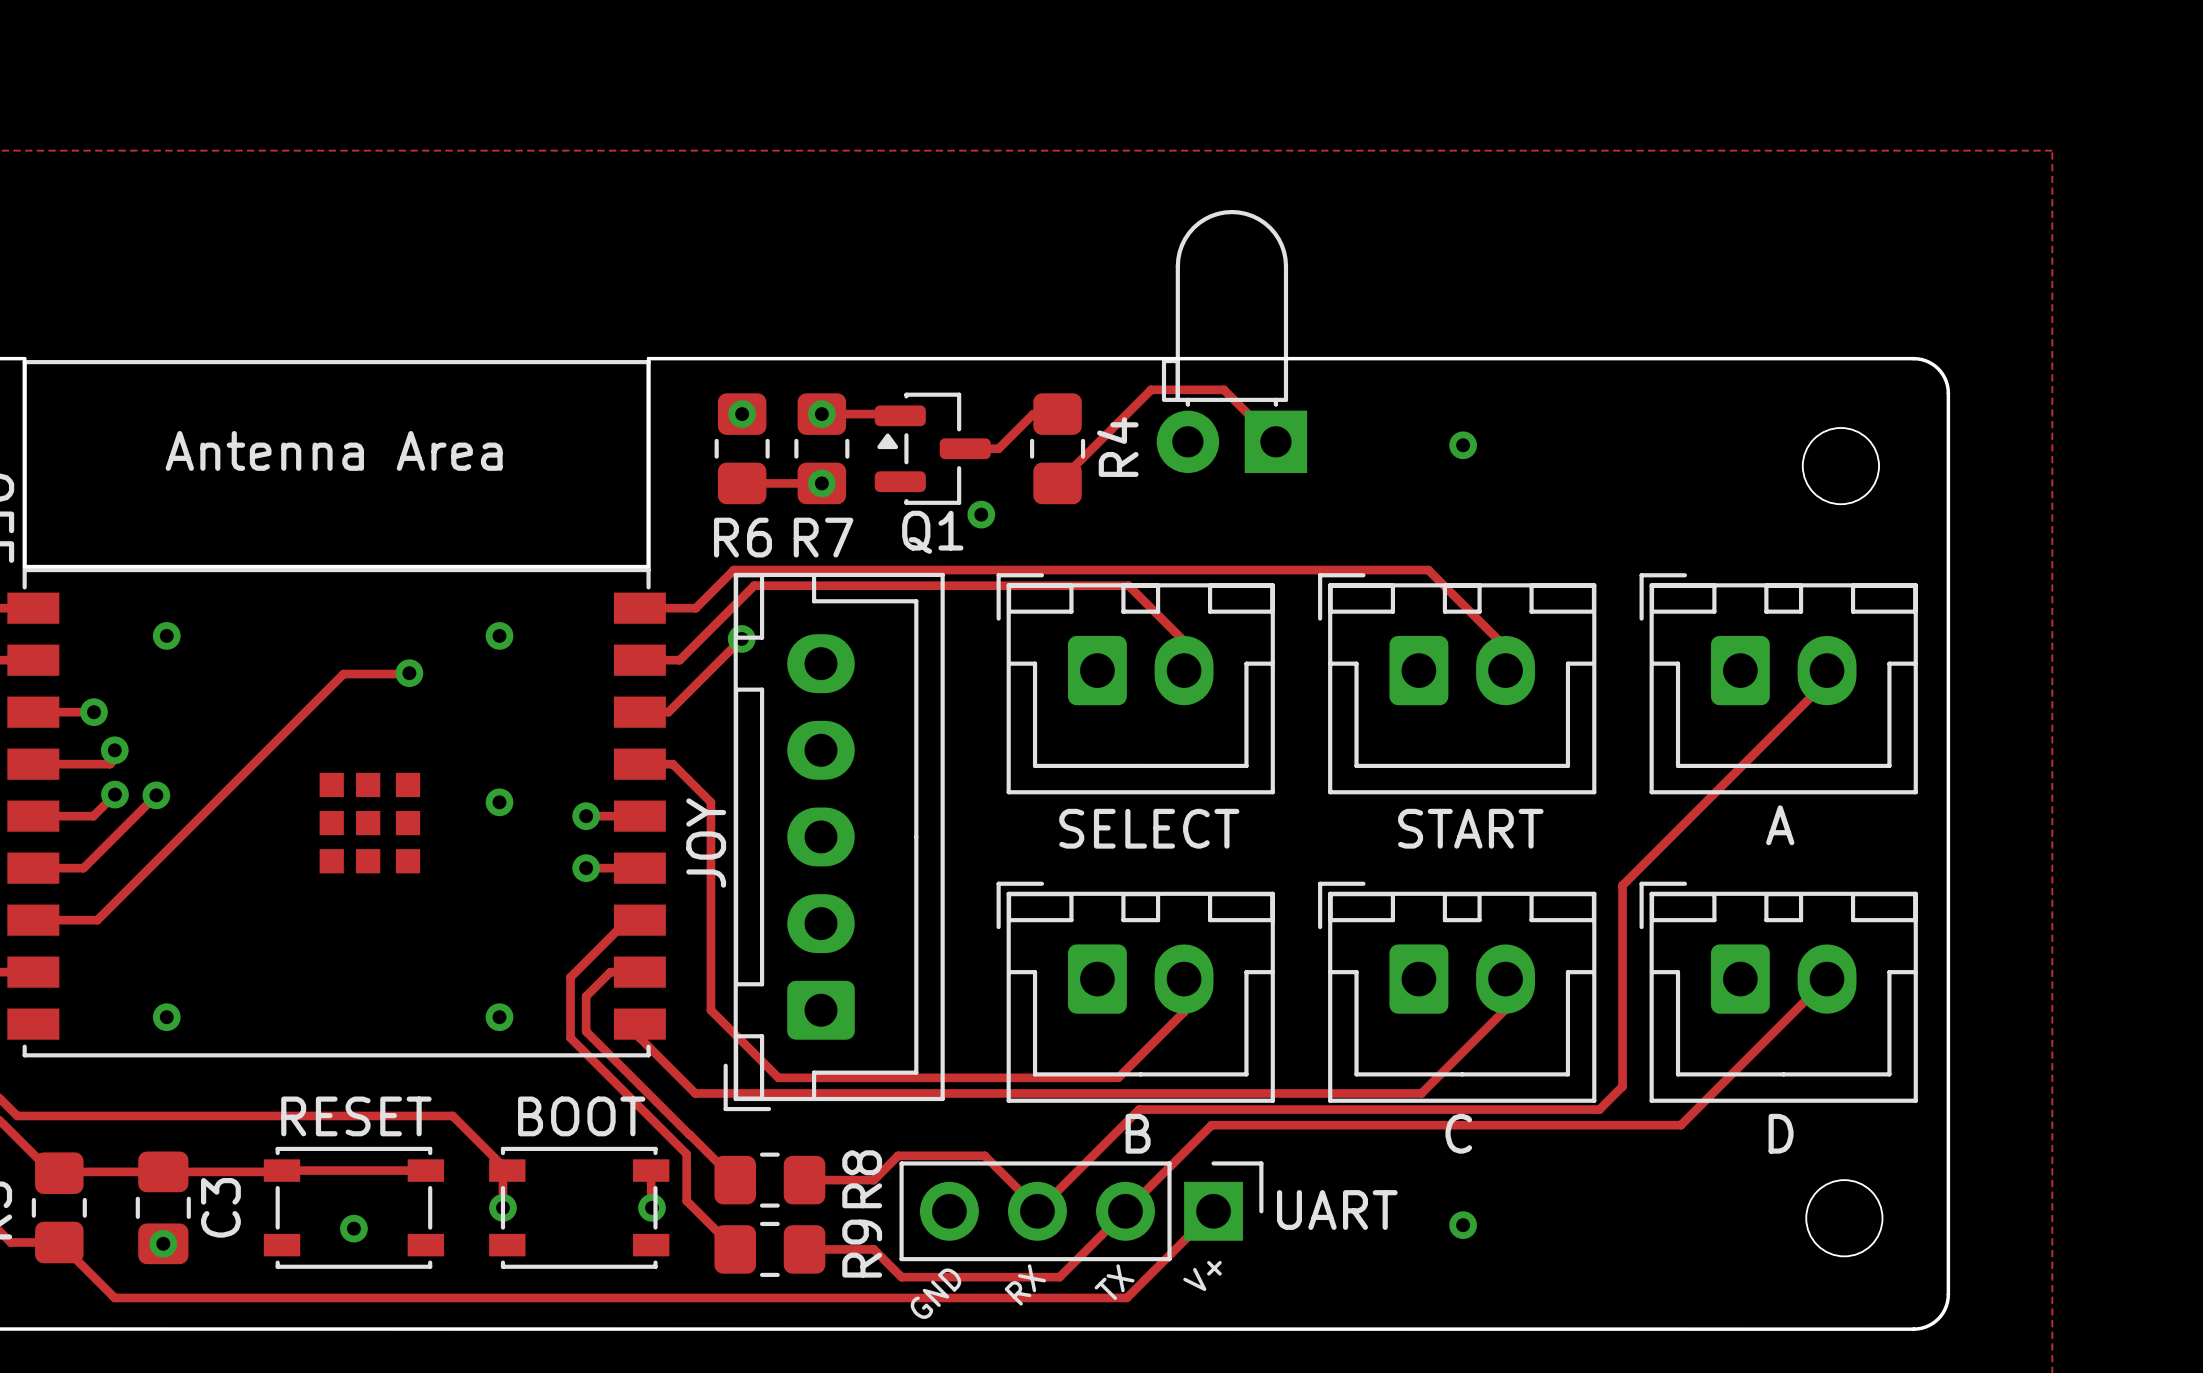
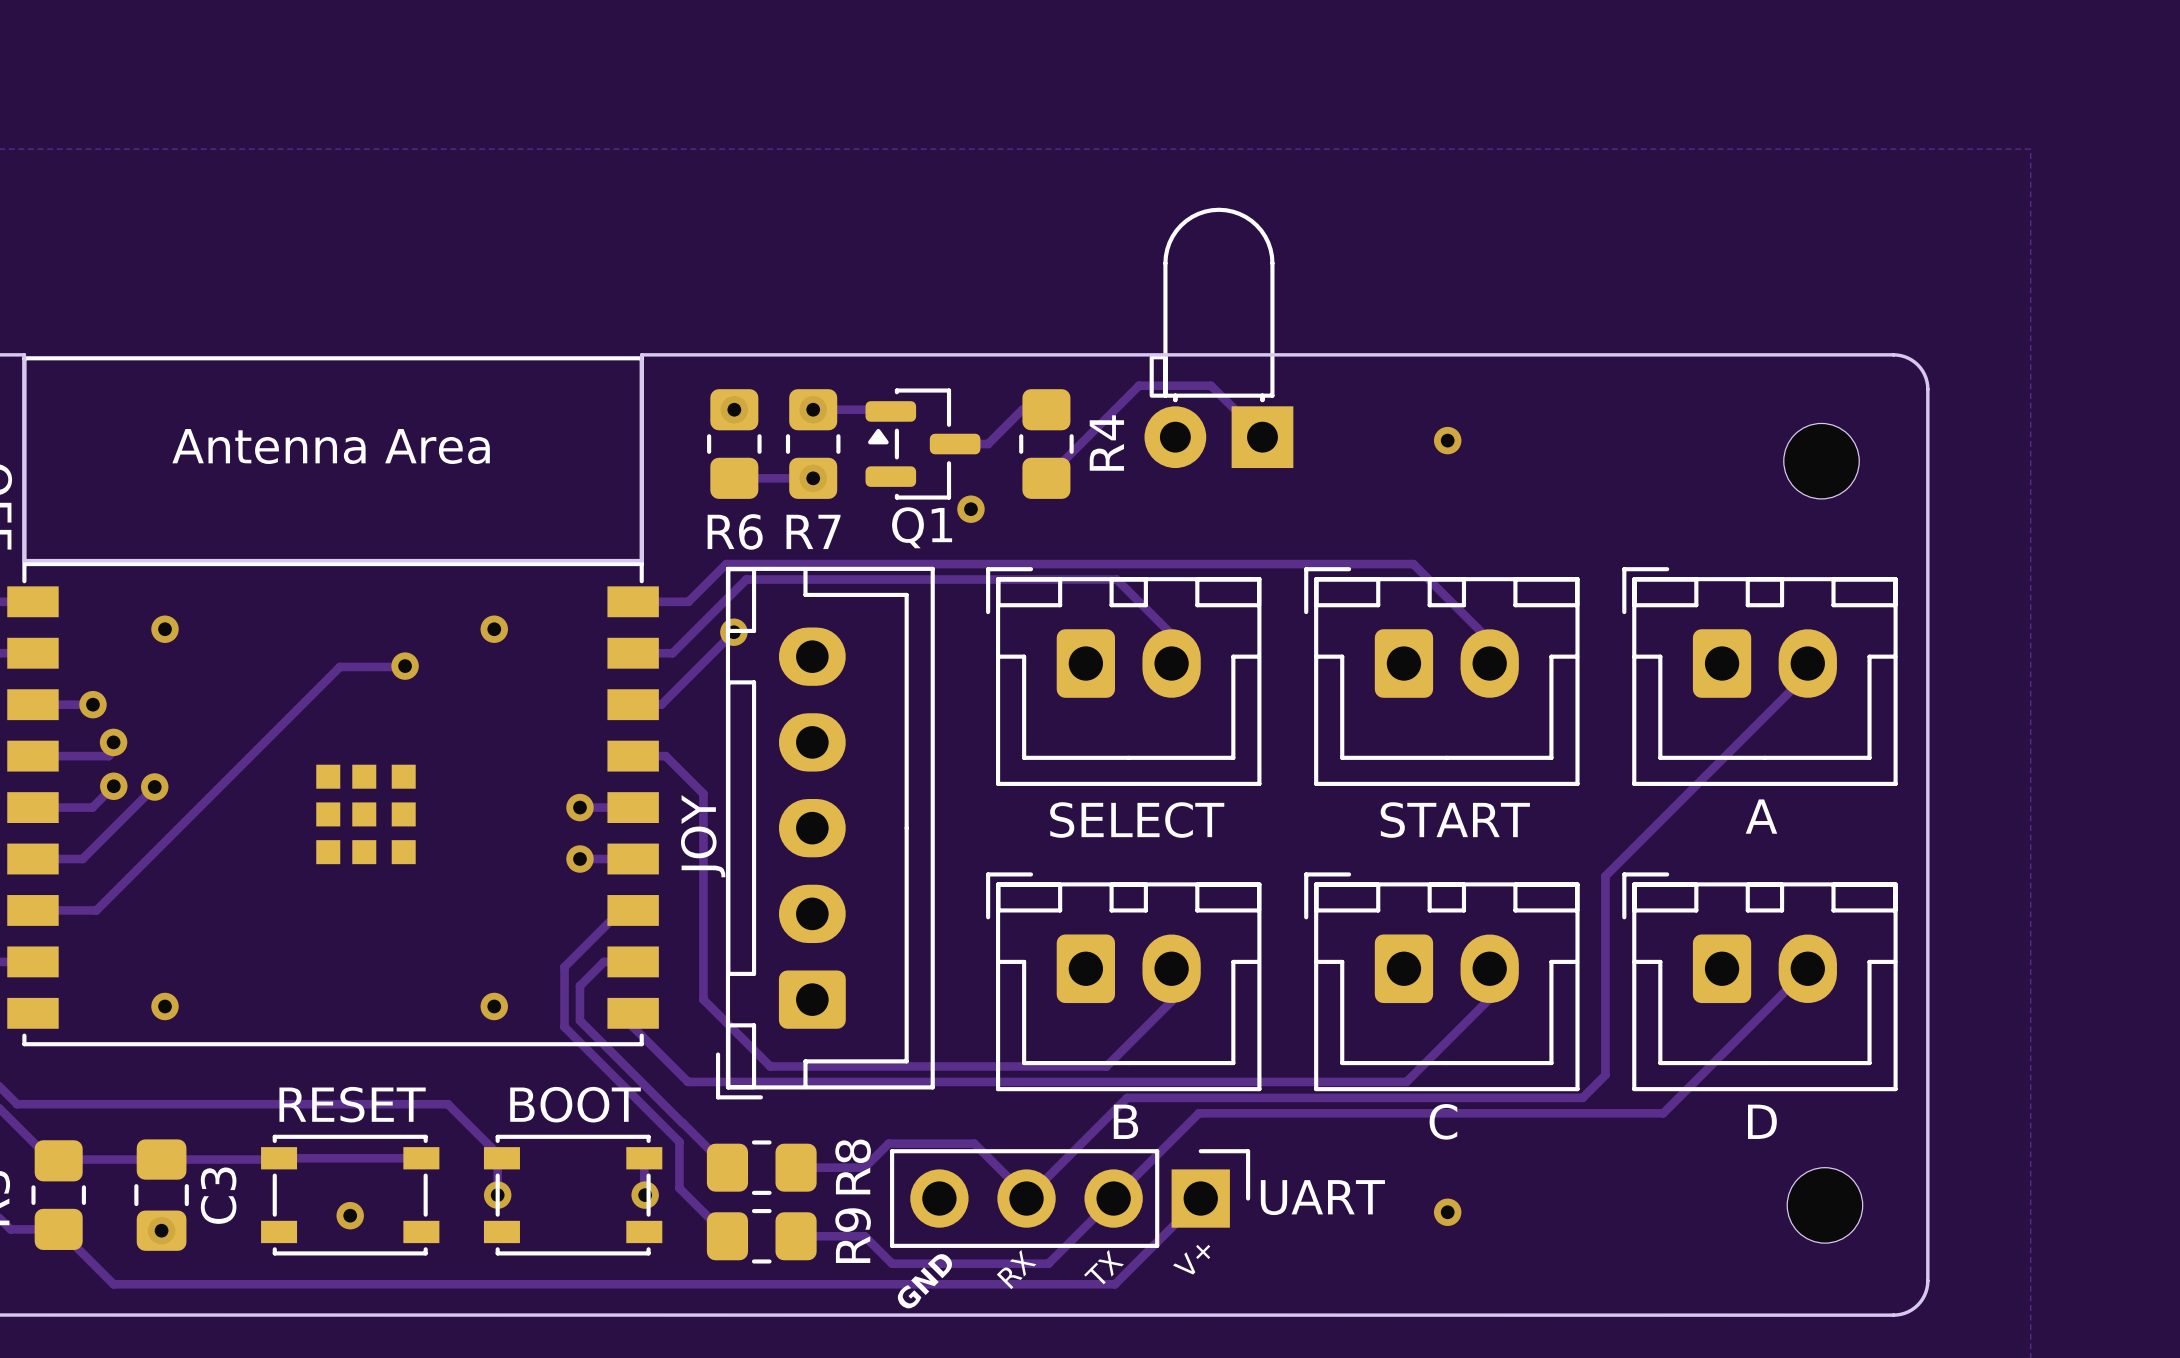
via: (499, 802) -> none

